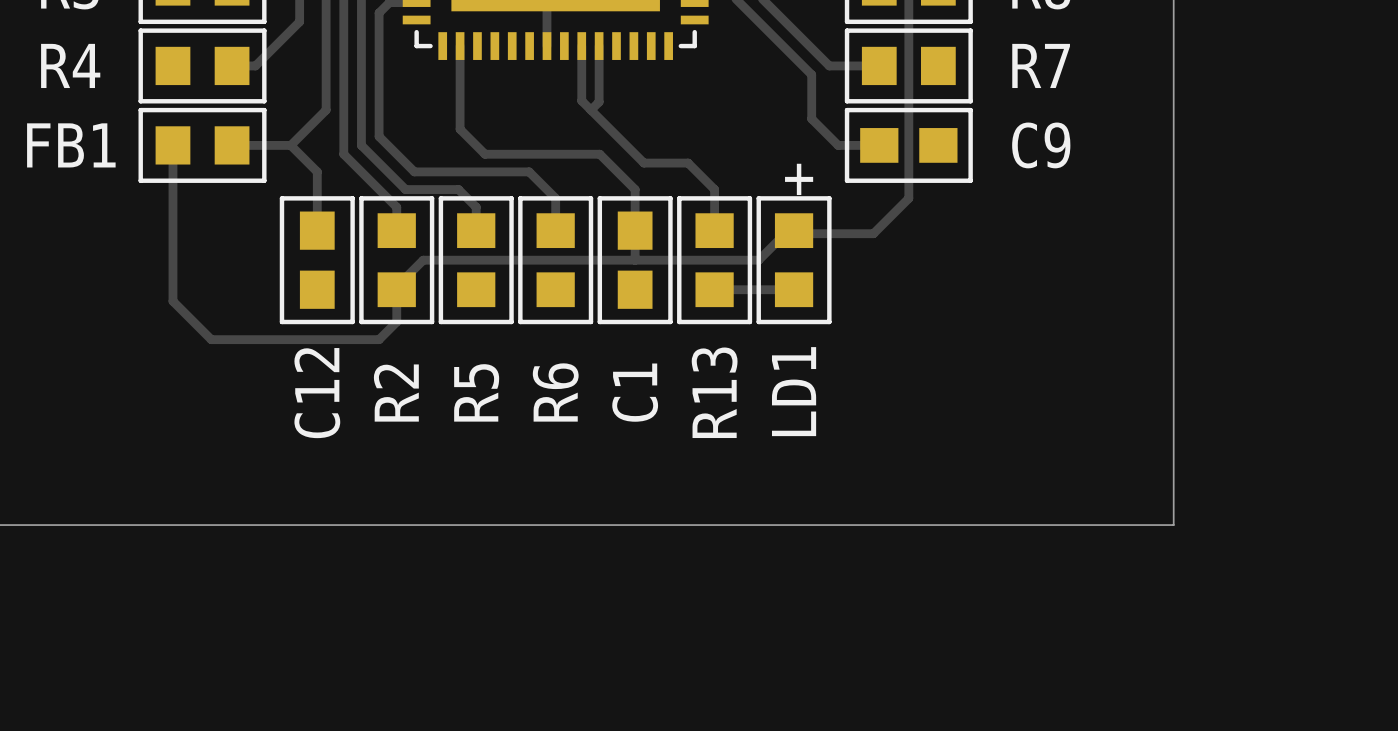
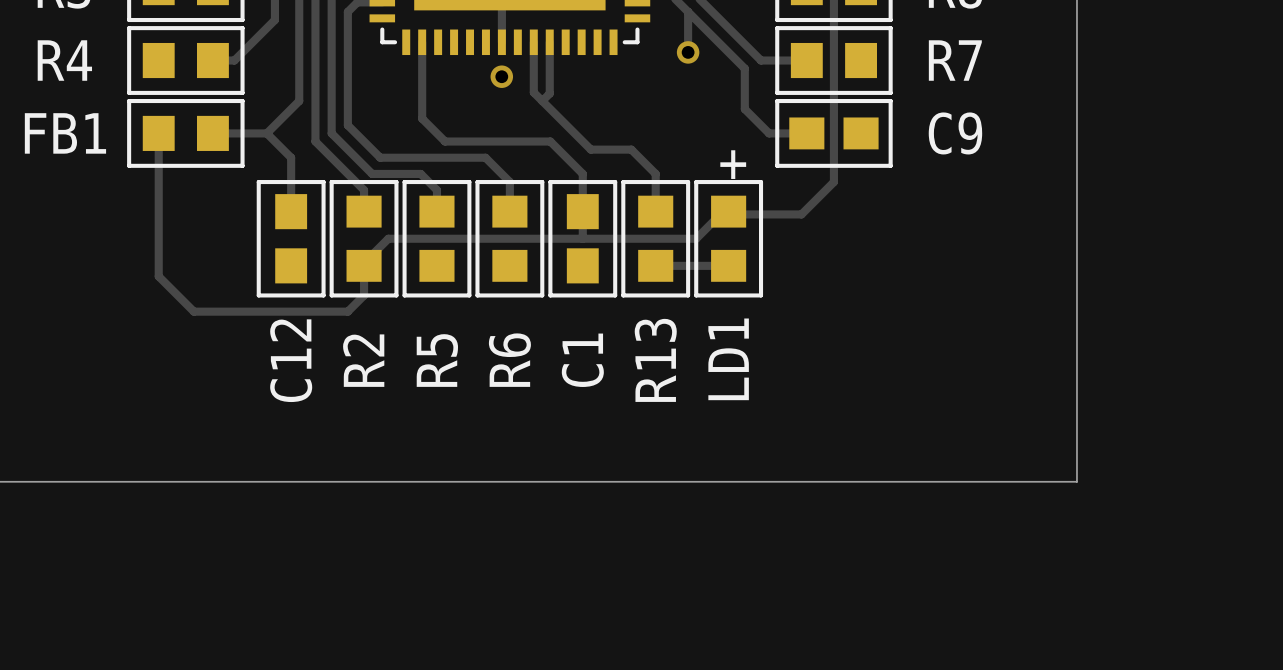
track: none -> (688, 11) (688, 52)
via: none -> (688, 52)
via: none -> (501, 76)

